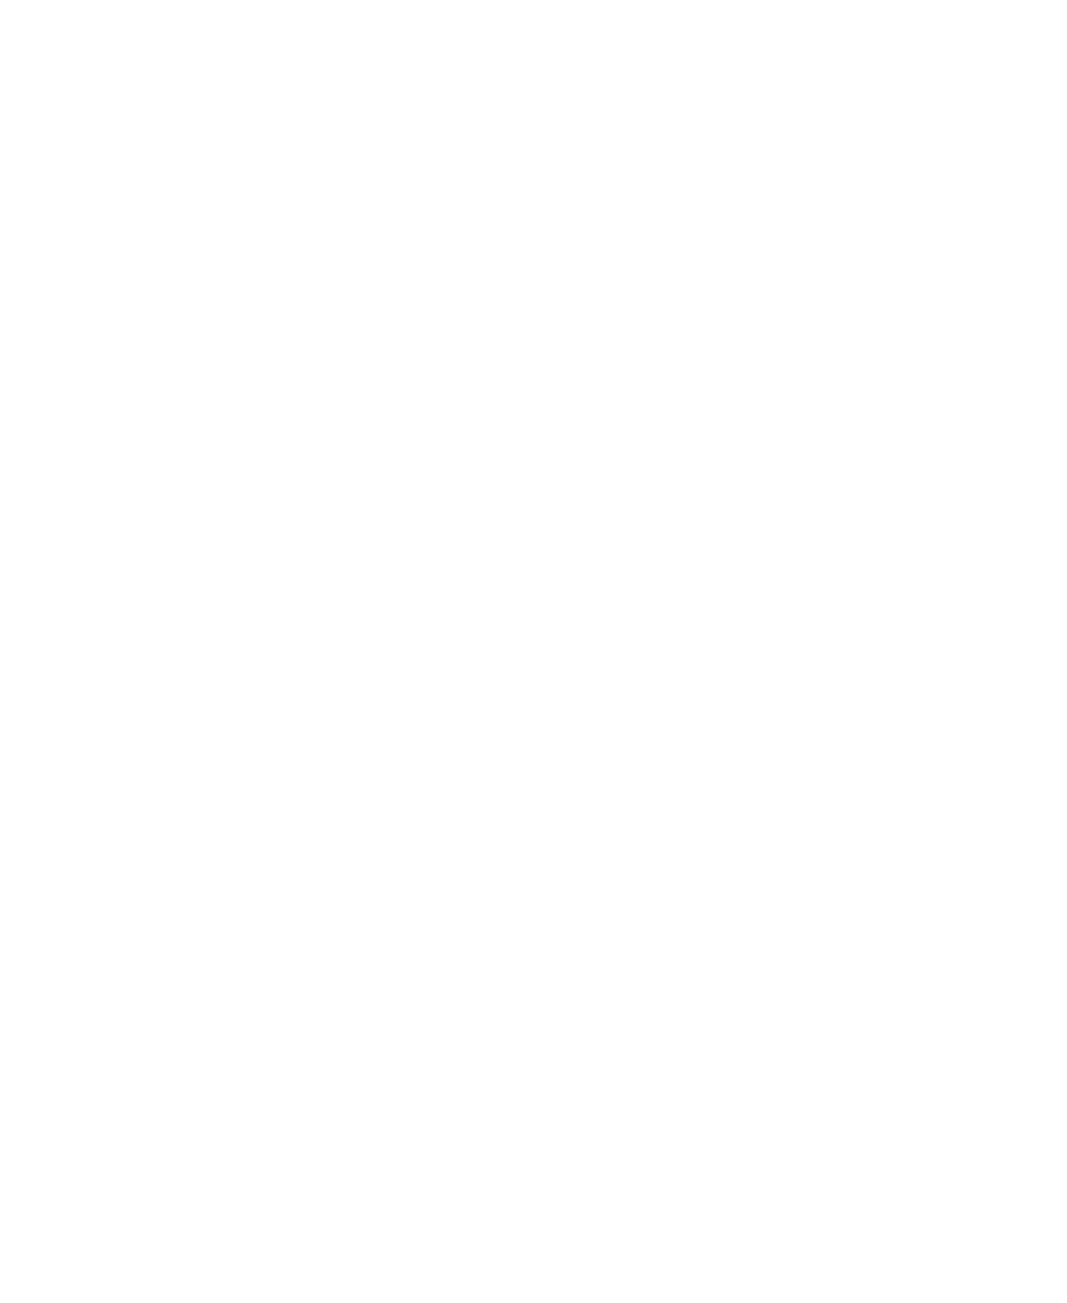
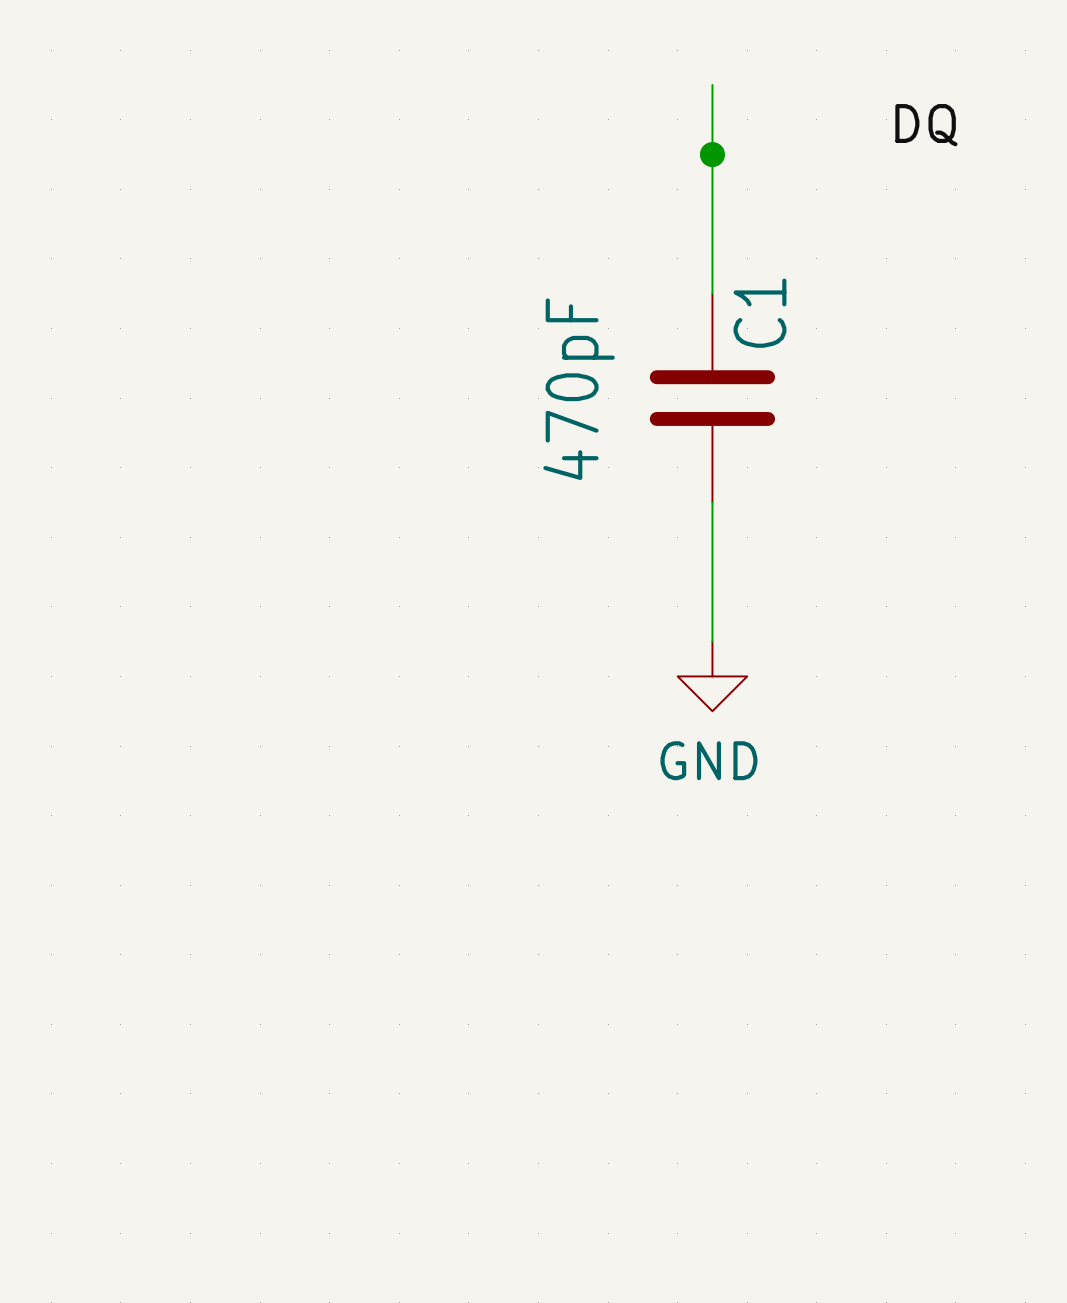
wire: none -> (712, 84) (712, 293)
label: none -> DQ (926, 125)
junction: none -> (712, 154)
C1: none -> 470pF (712, 398)
wire: none -> (712, 502) (712, 641)
power symbol: none -> GND (712, 676)

